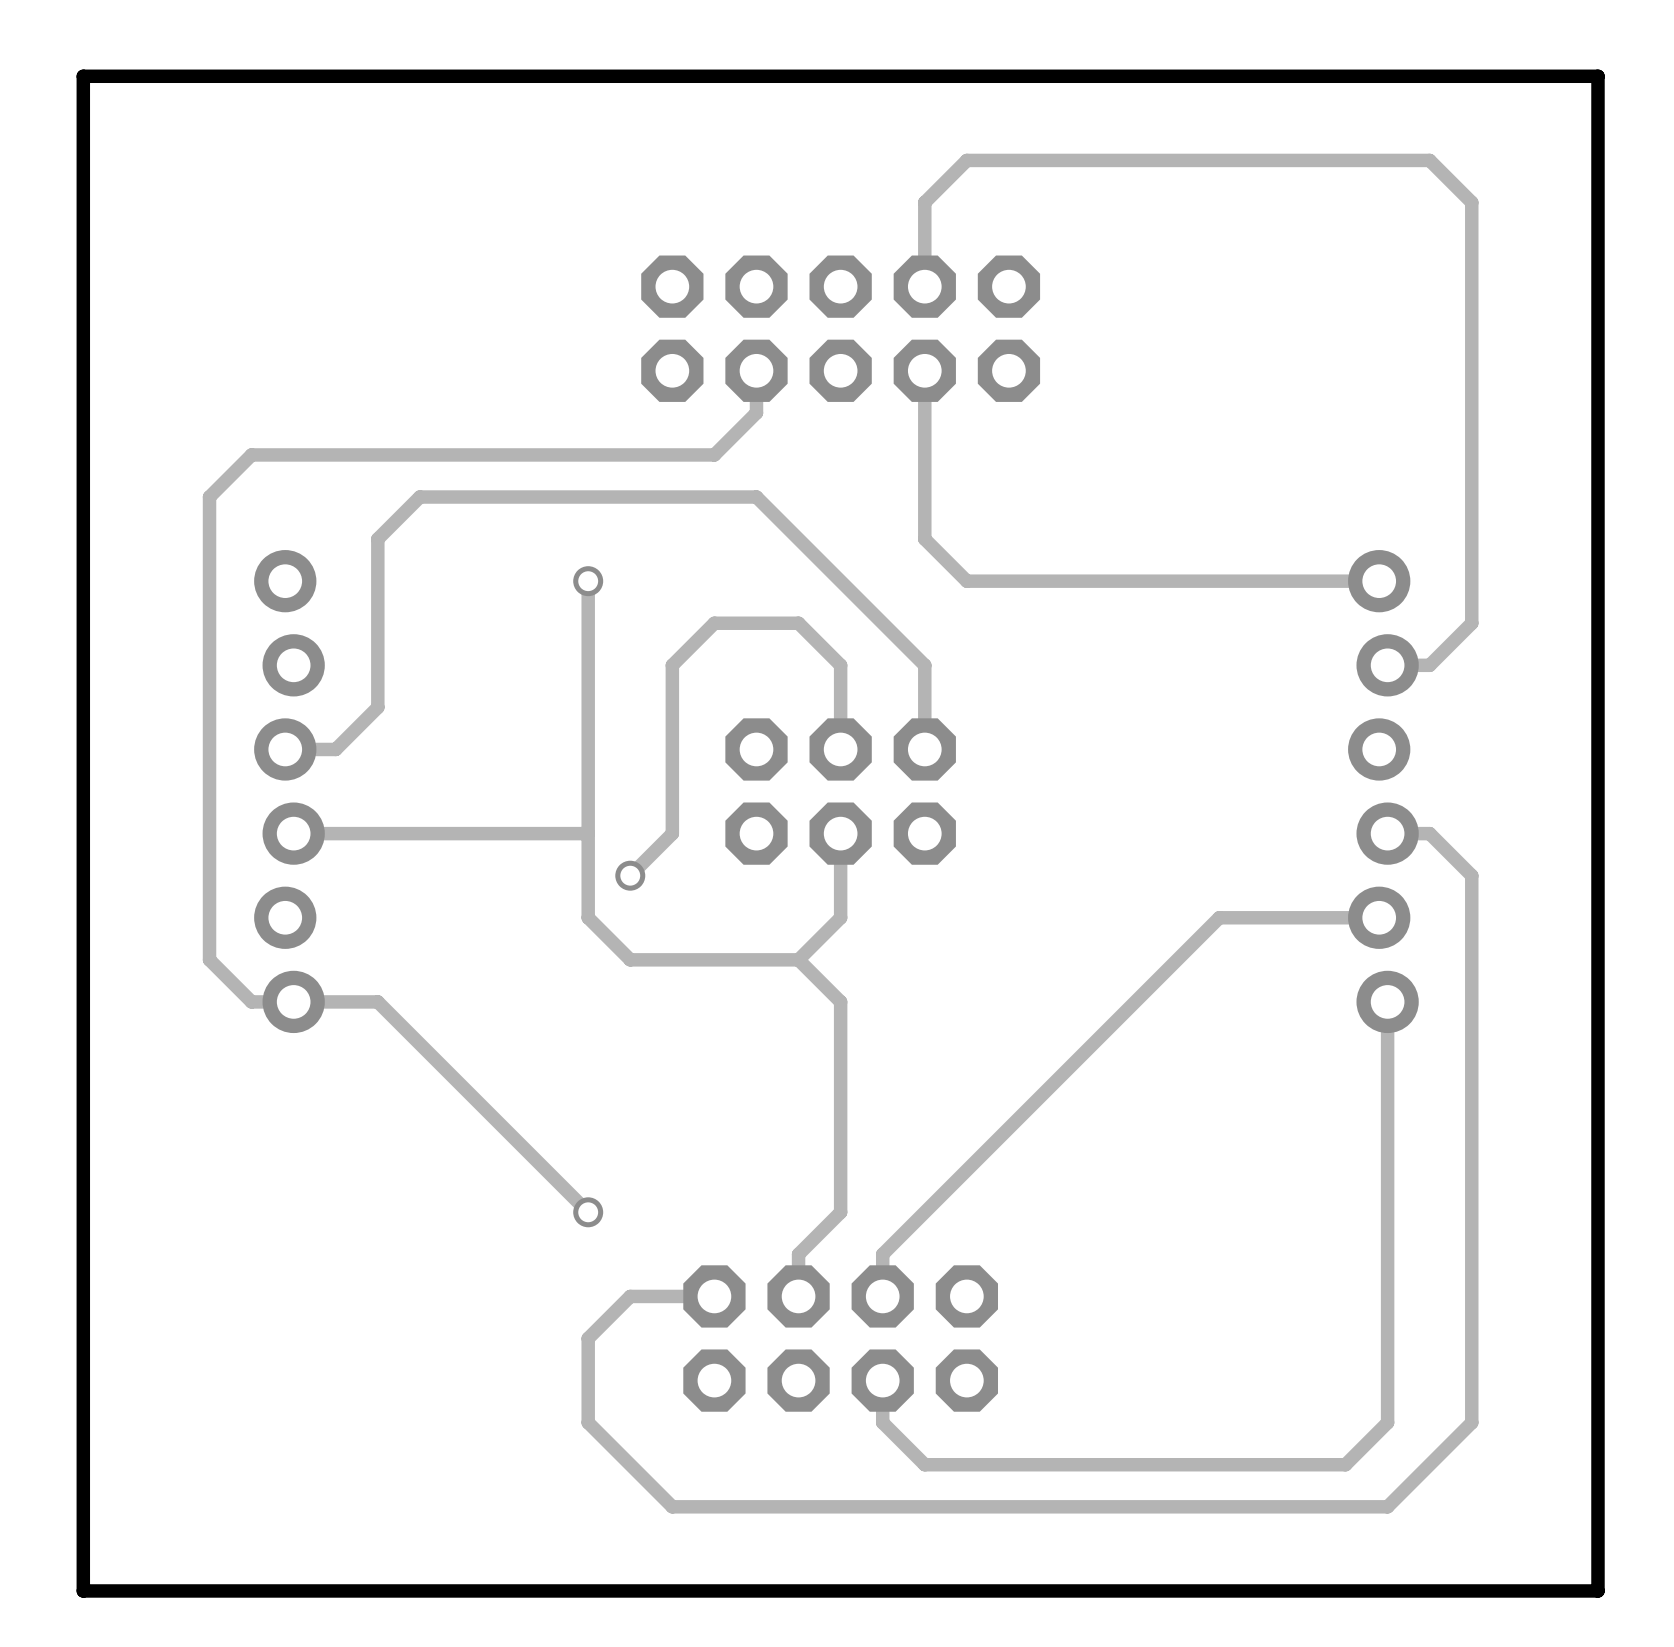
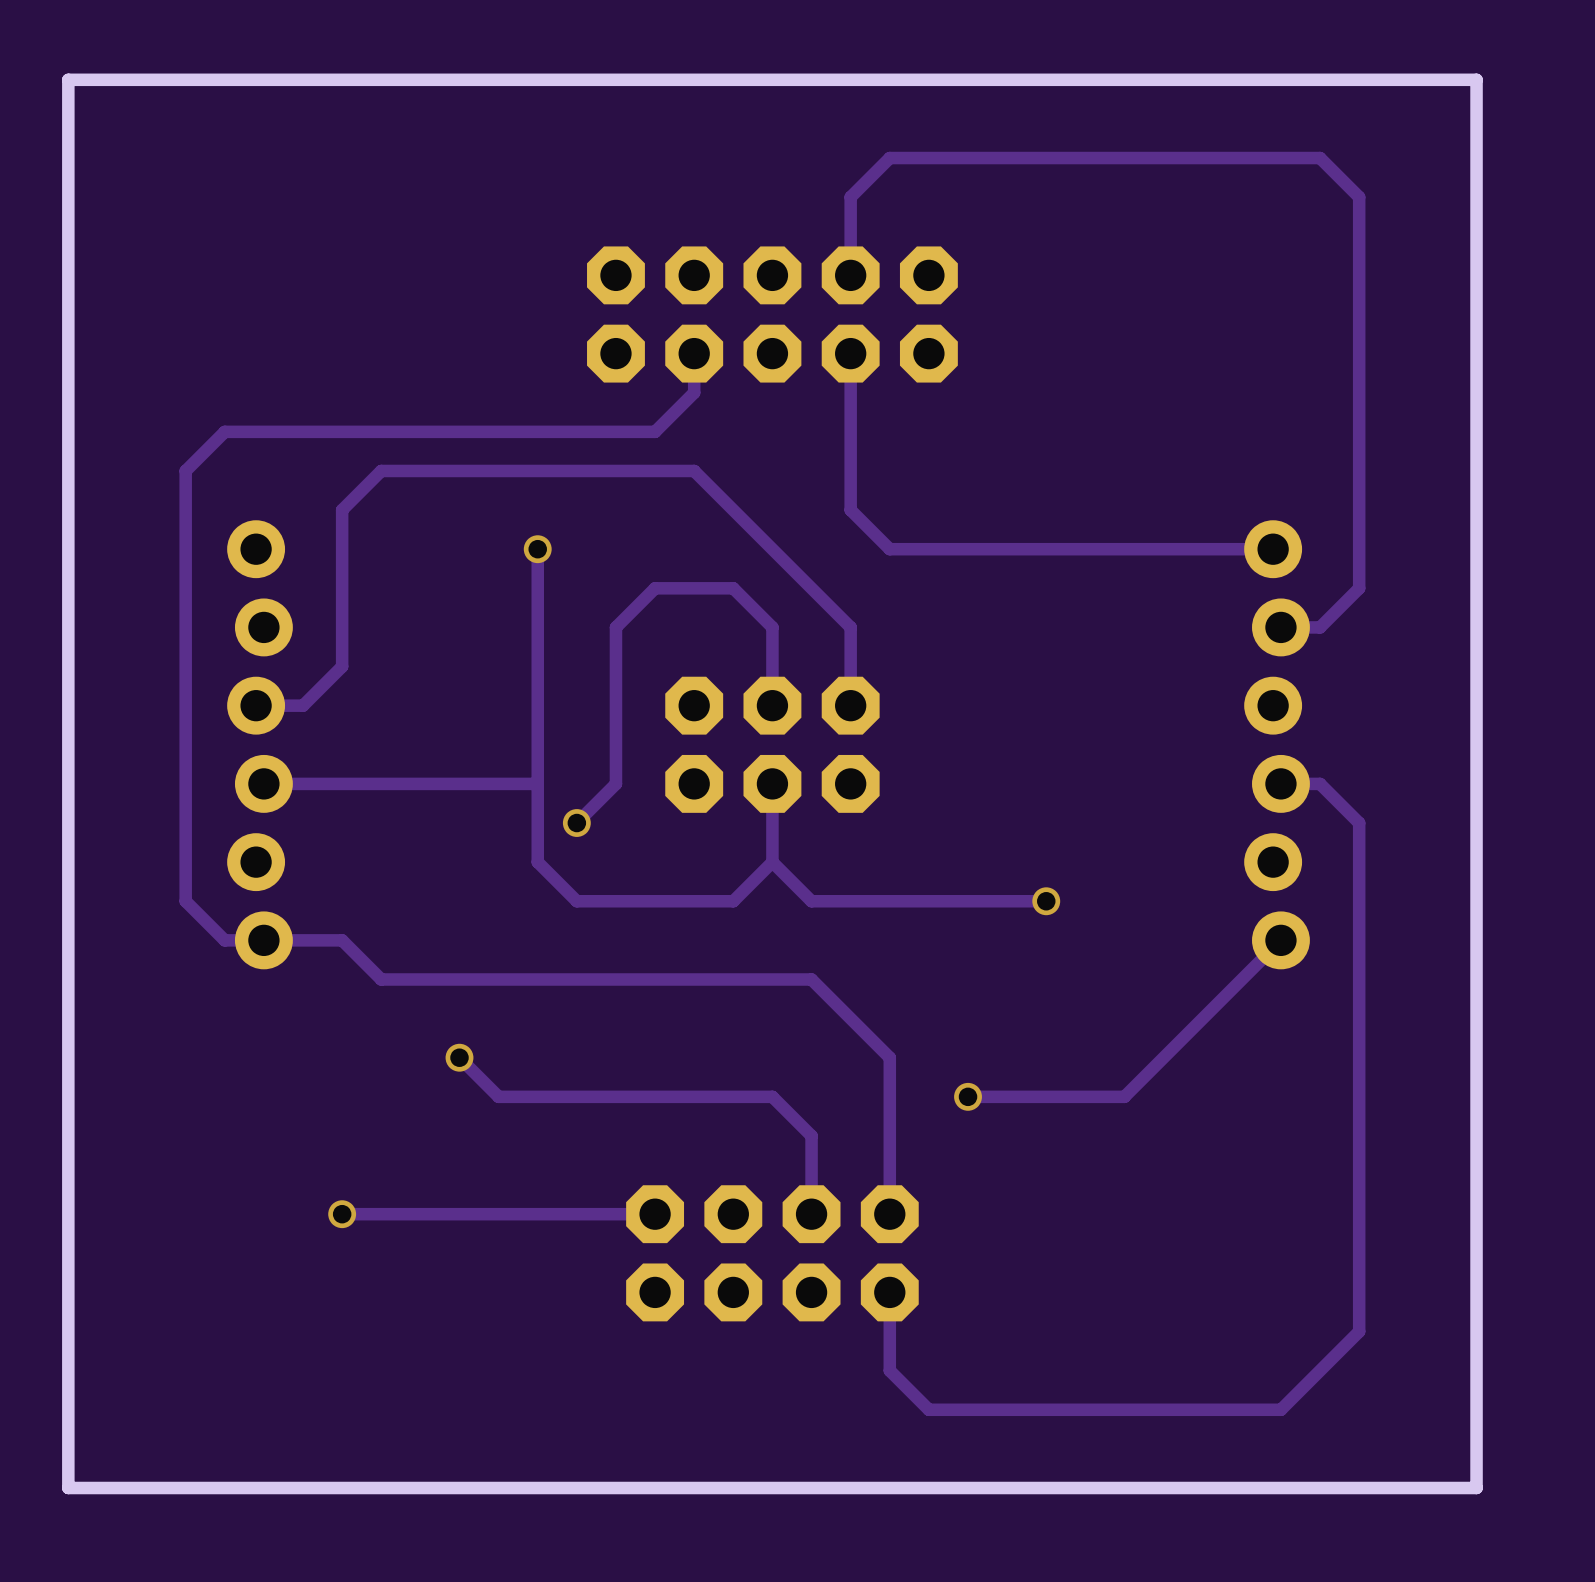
track: none -> (772, 862) (811, 901) (1046, 901)
track: (1379, 917) (1219, 917) (882, 1254) -> none
track: (798, 959) (840, 1001) (840, 1212) (798, 1254) (798, 1296) -> none
via: none -> (1046, 901)
track: (1387, 1001) (1387, 1422) (1345, 1464) (924, 1464) (882, 1422) (882, 1380) -> (1280, 940) (1124, 1096) (968, 1096)
track: (419, 1043) (504, 1128) -> (381, 979) (811, 979) (889, 1057) (889, 1214)
via: none -> (459, 1057)
track: (546, 1170) (588, 1212) -> (498, 1096) (772, 1096) (811, 1135) (811, 1175)
via: none -> (968, 1096)
via: (588, 1212) -> none
via: none -> (342, 1214)
track: (630, 1296) (588, 1338) (588, 1422) (672, 1506) (1008, 1506) -> (889, 1292) (889, 1370) (928, 1409)
track: none -> (576, 1214) (342, 1214)

